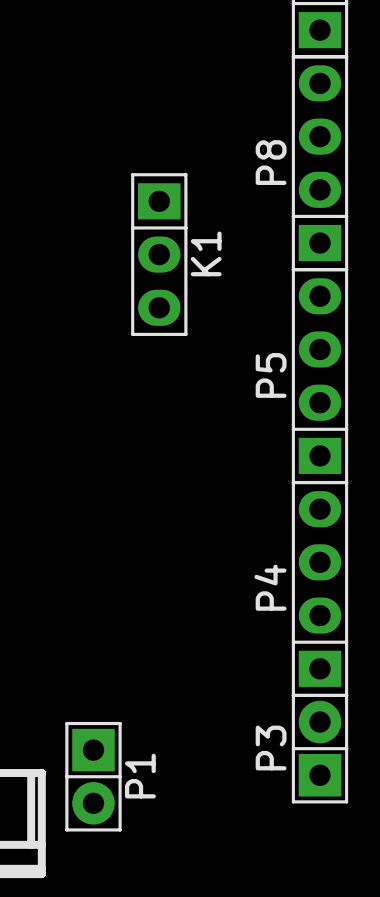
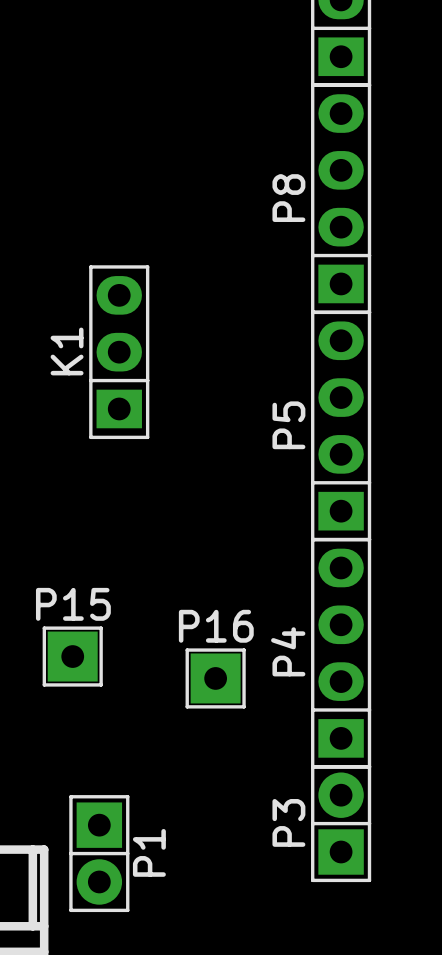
K1 rotation: 0° (159, 254) -> 180° (119, 352)
P15: none -> (72, 656)
P16: none -> (215, 678)

